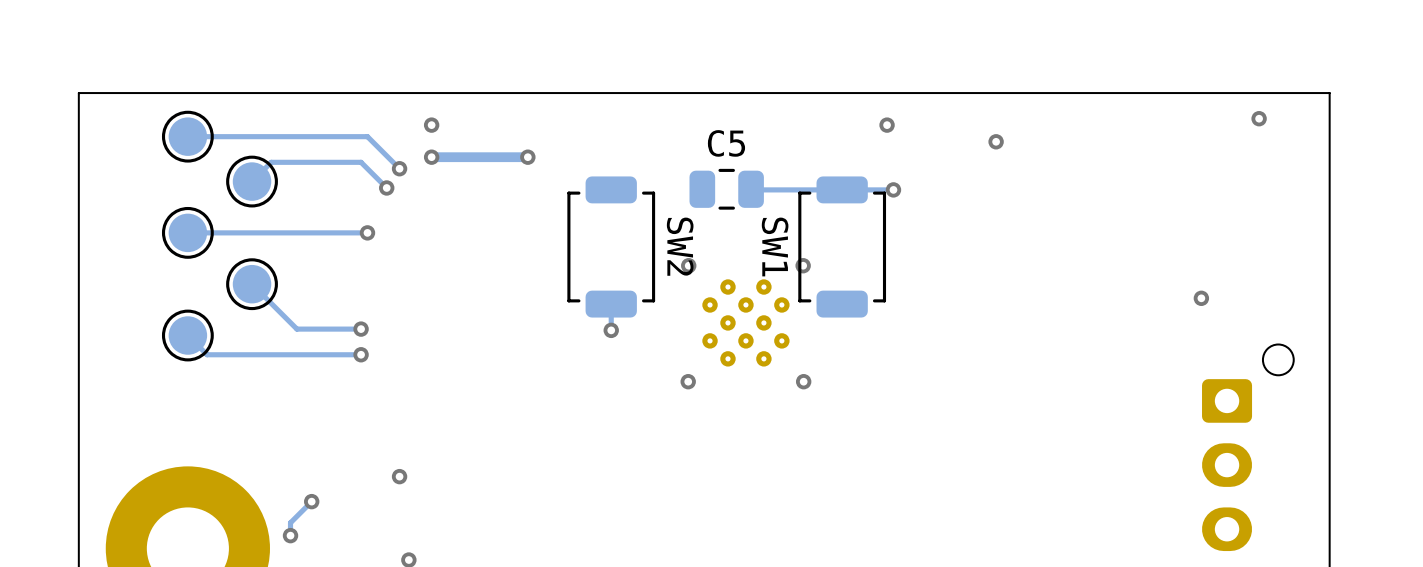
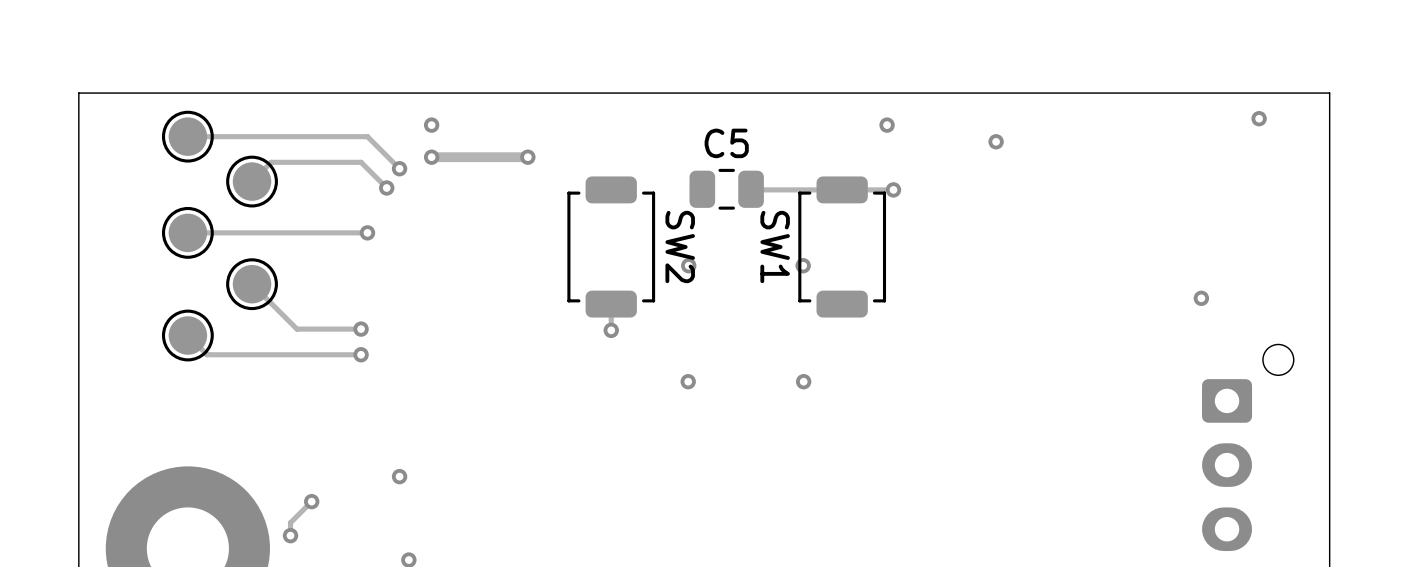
part: (745, 322) -> none

